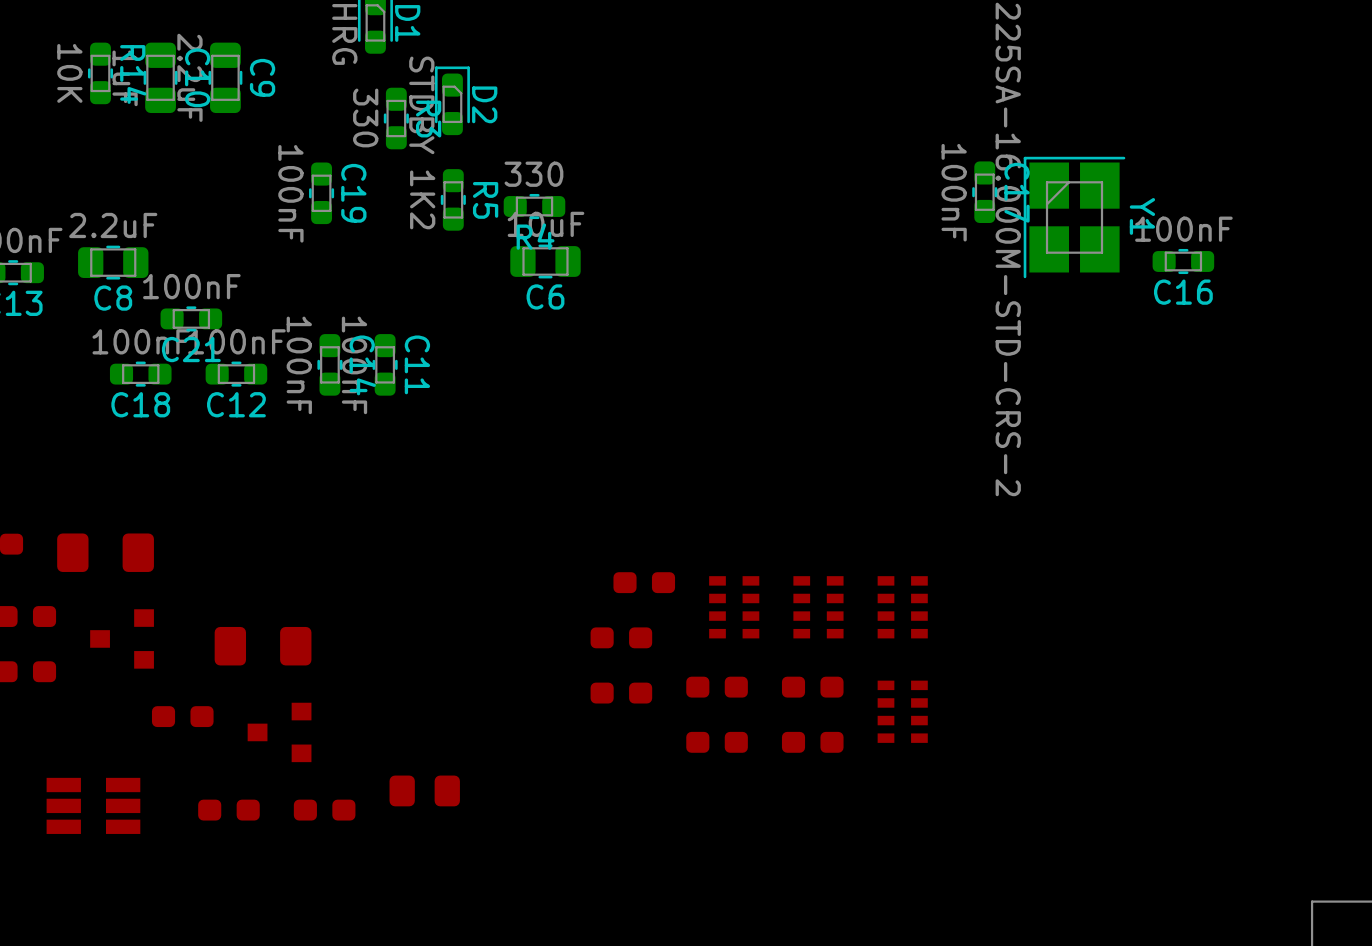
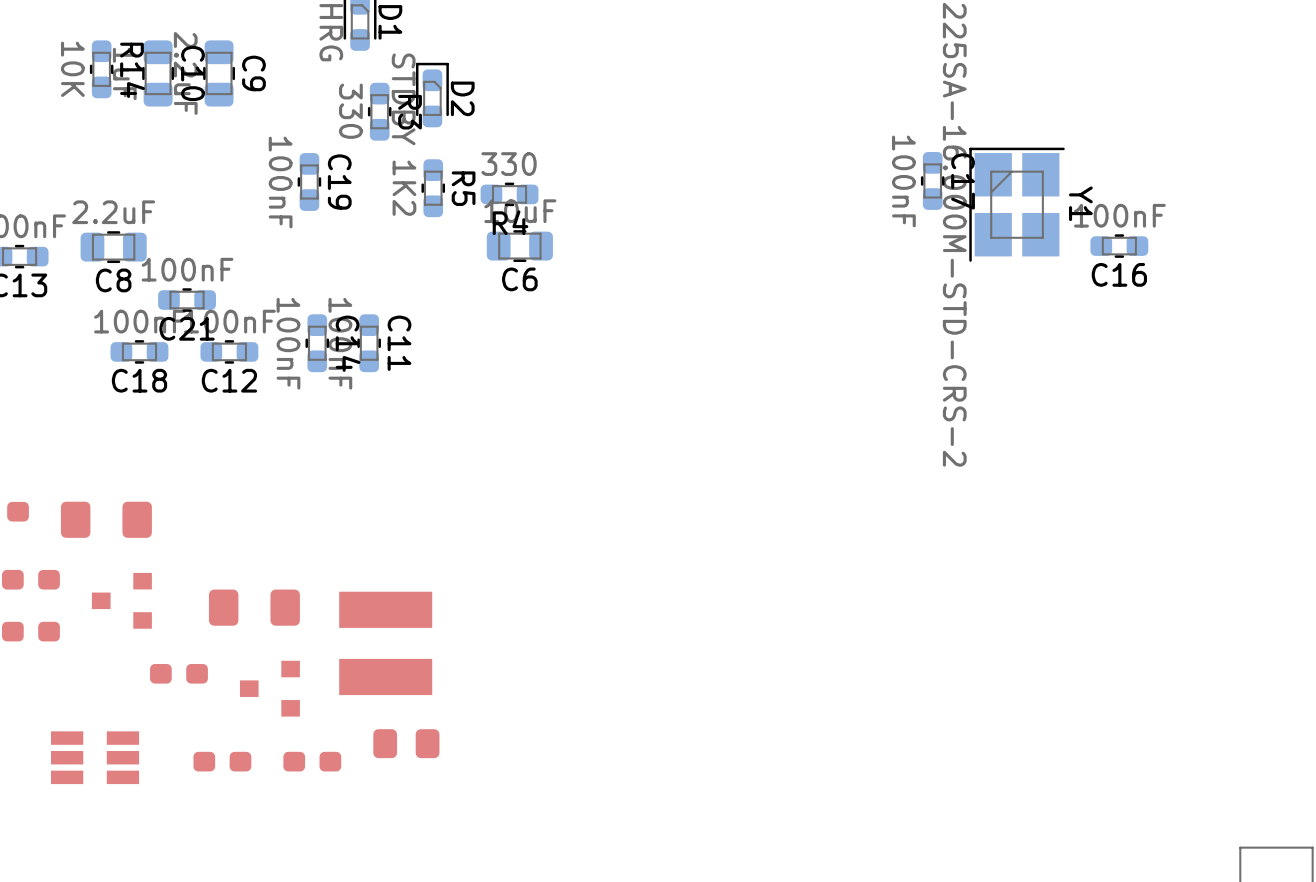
part: (644, 582) -> none
part: (734, 607) -> none
part: (818, 607) -> none
part: (902, 607) -> none
part: (621, 637) -> none
part: none -> (385, 643)
part: (717, 687) -> none
part: (812, 687) -> none
part: (621, 693) -> none
part: (902, 711) -> none
part: (717, 742) -> none
part: (812, 742) -> none

